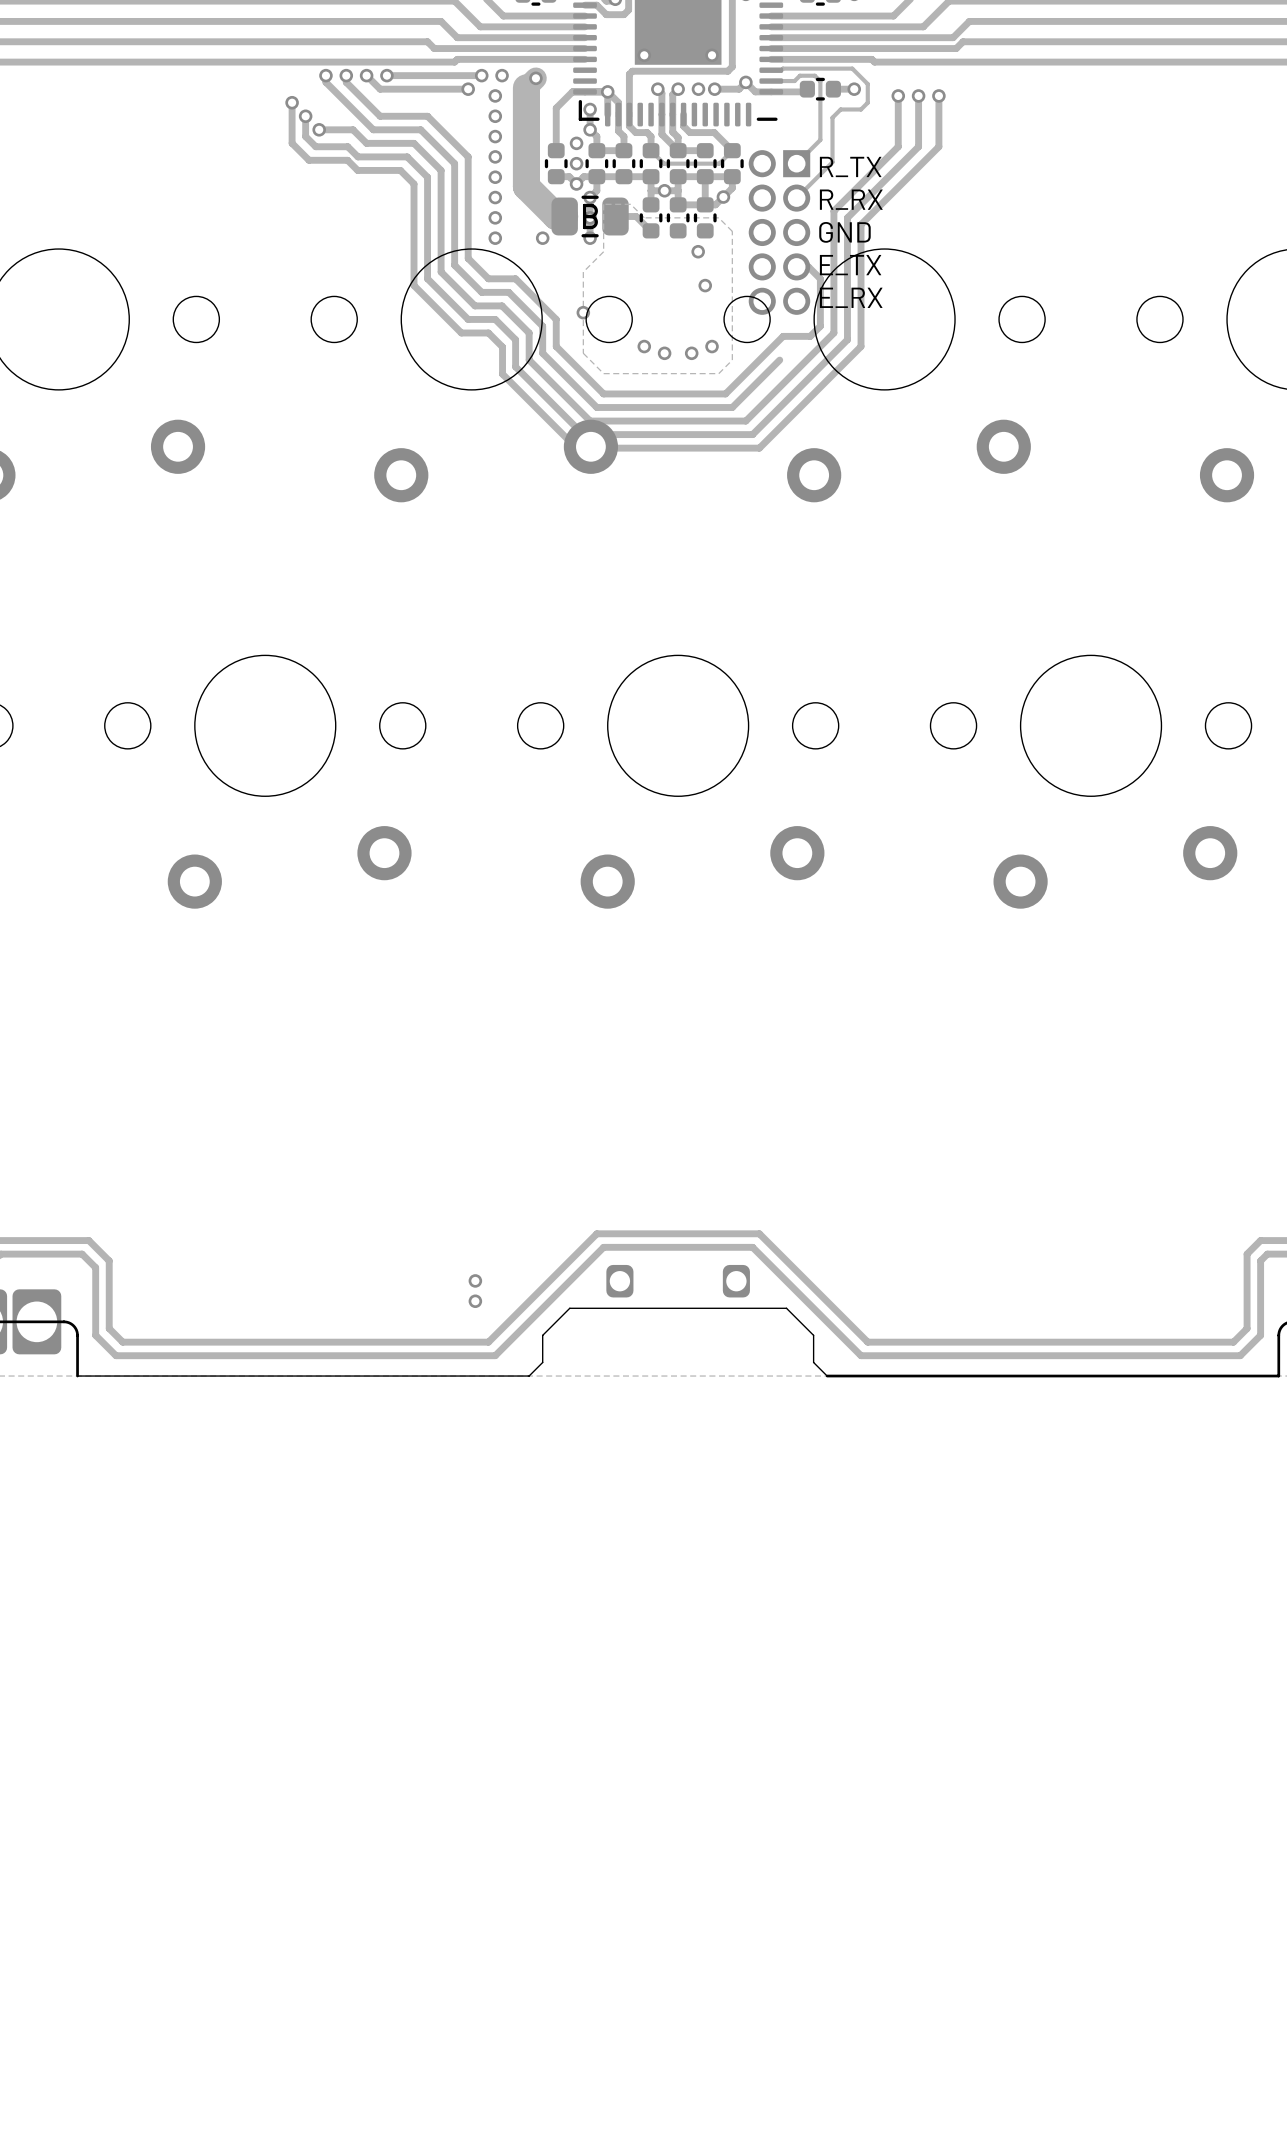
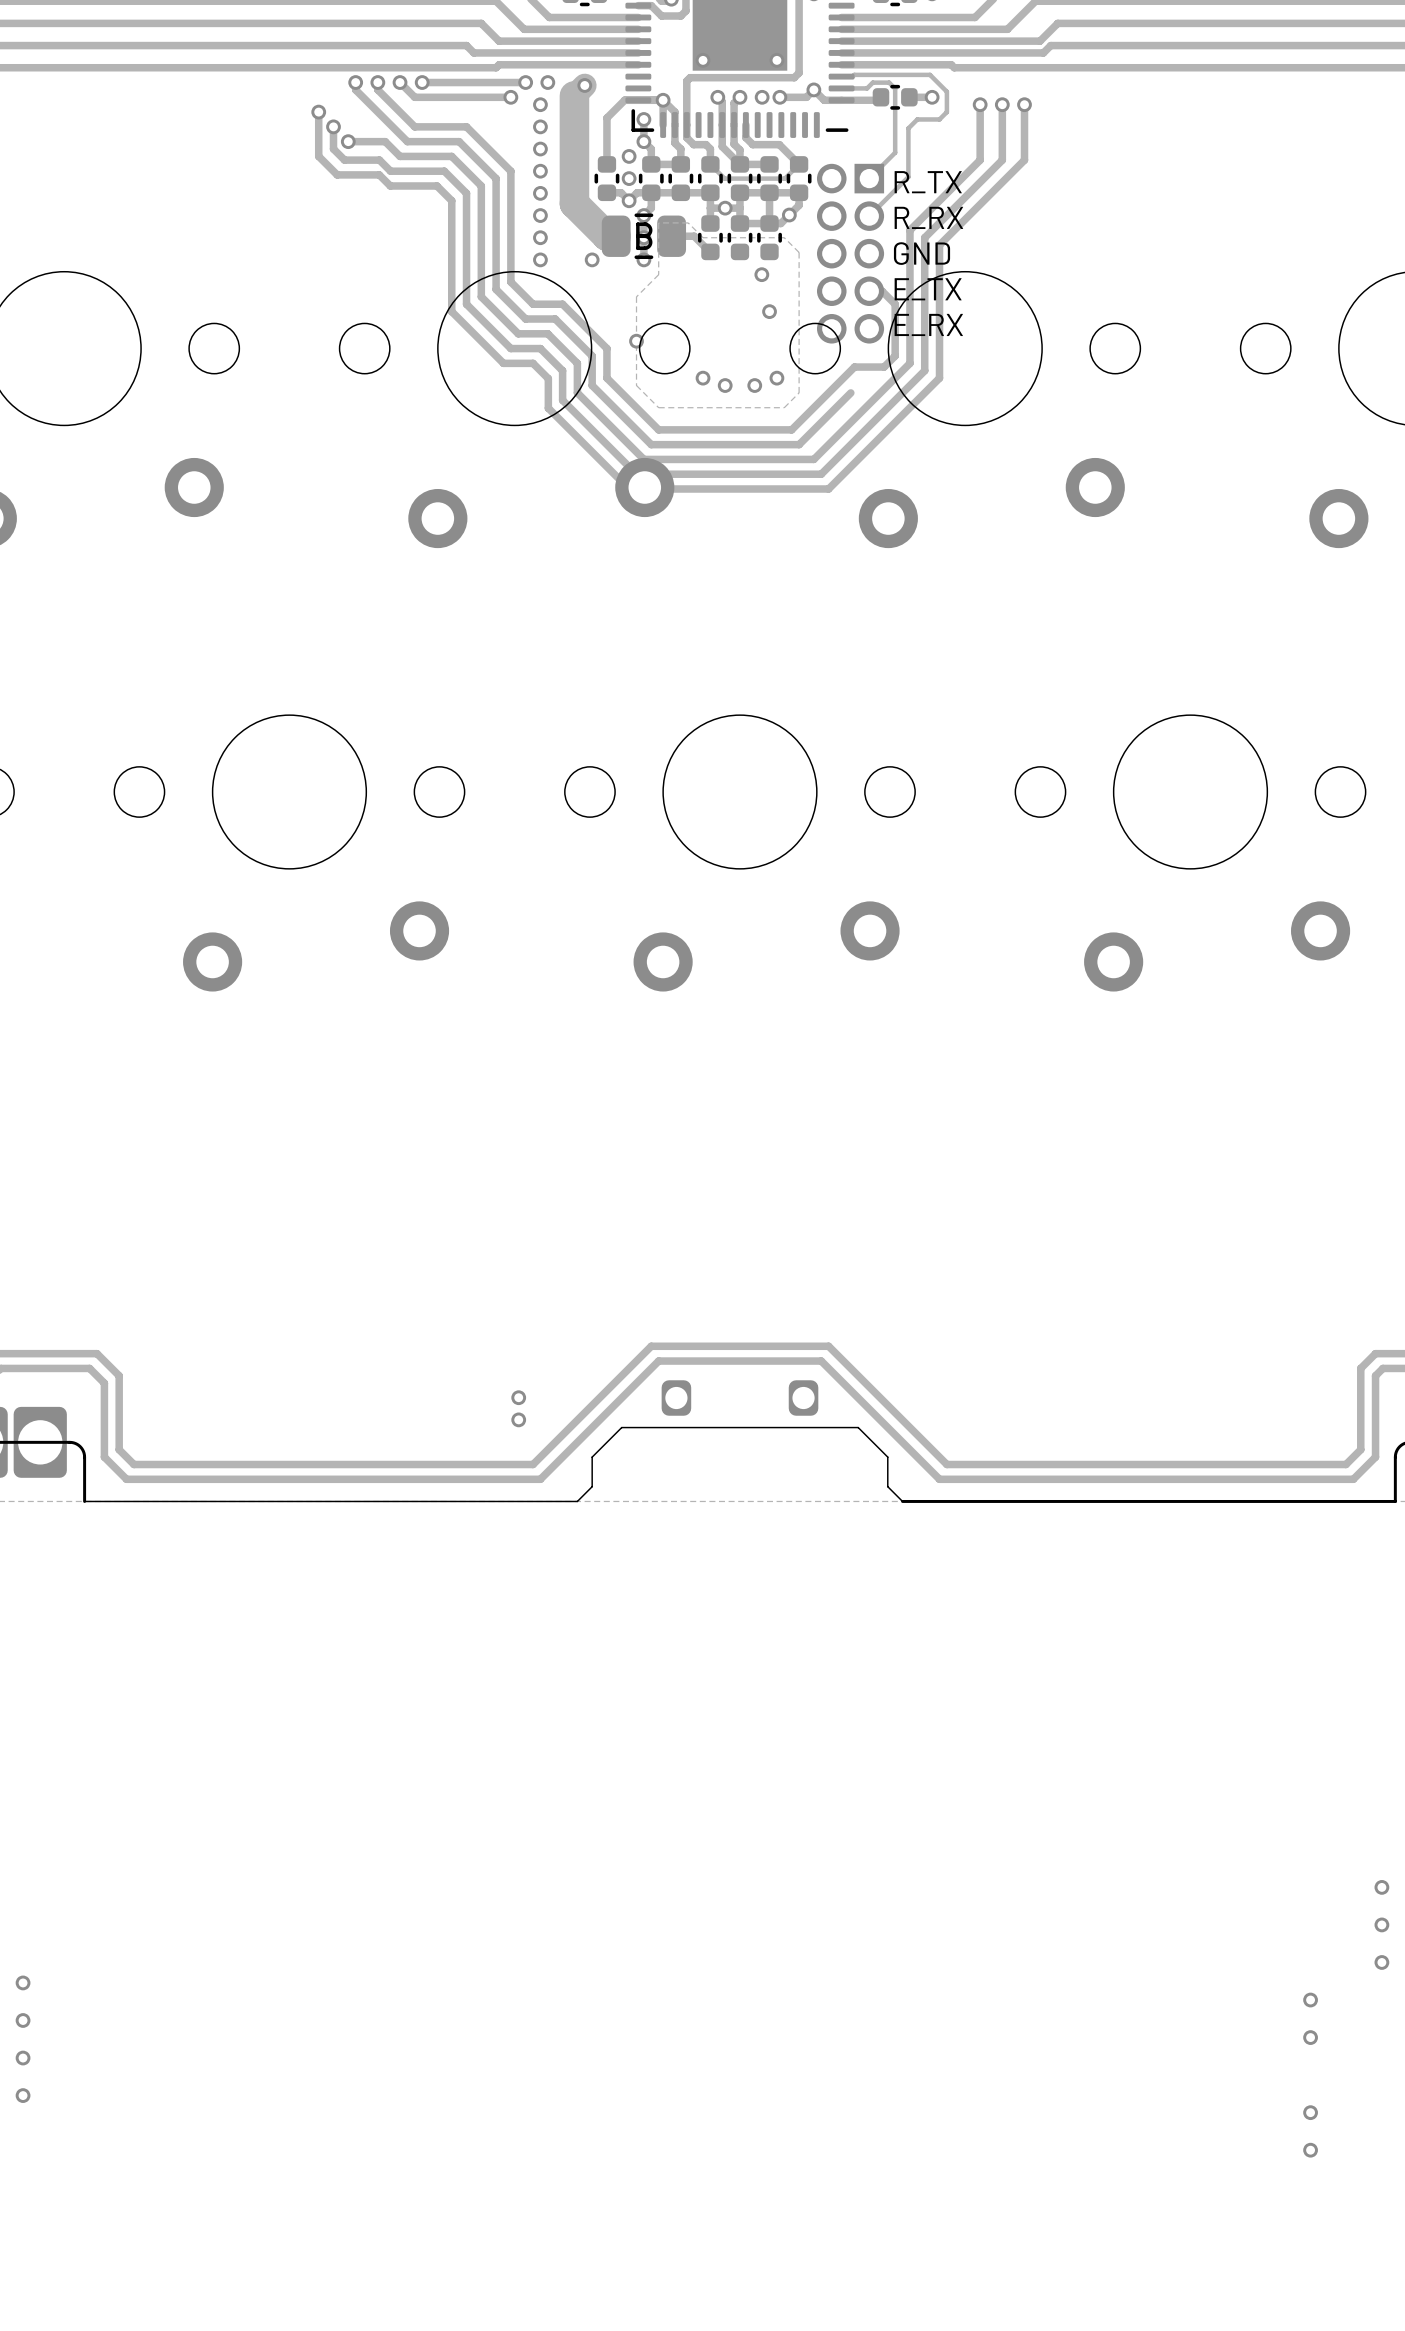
via: none -> (1381, 1887)
via: none -> (1381, 1924)
via: none -> (1381, 1962)
via: none -> (23, 1982)
via: none -> (1310, 2000)
via: none -> (23, 2020)
via: none -> (1310, 2037)
via: none -> (23, 2058)
via: none -> (23, 2095)
via: none -> (1310, 2112)
via: none -> (1310, 2150)

